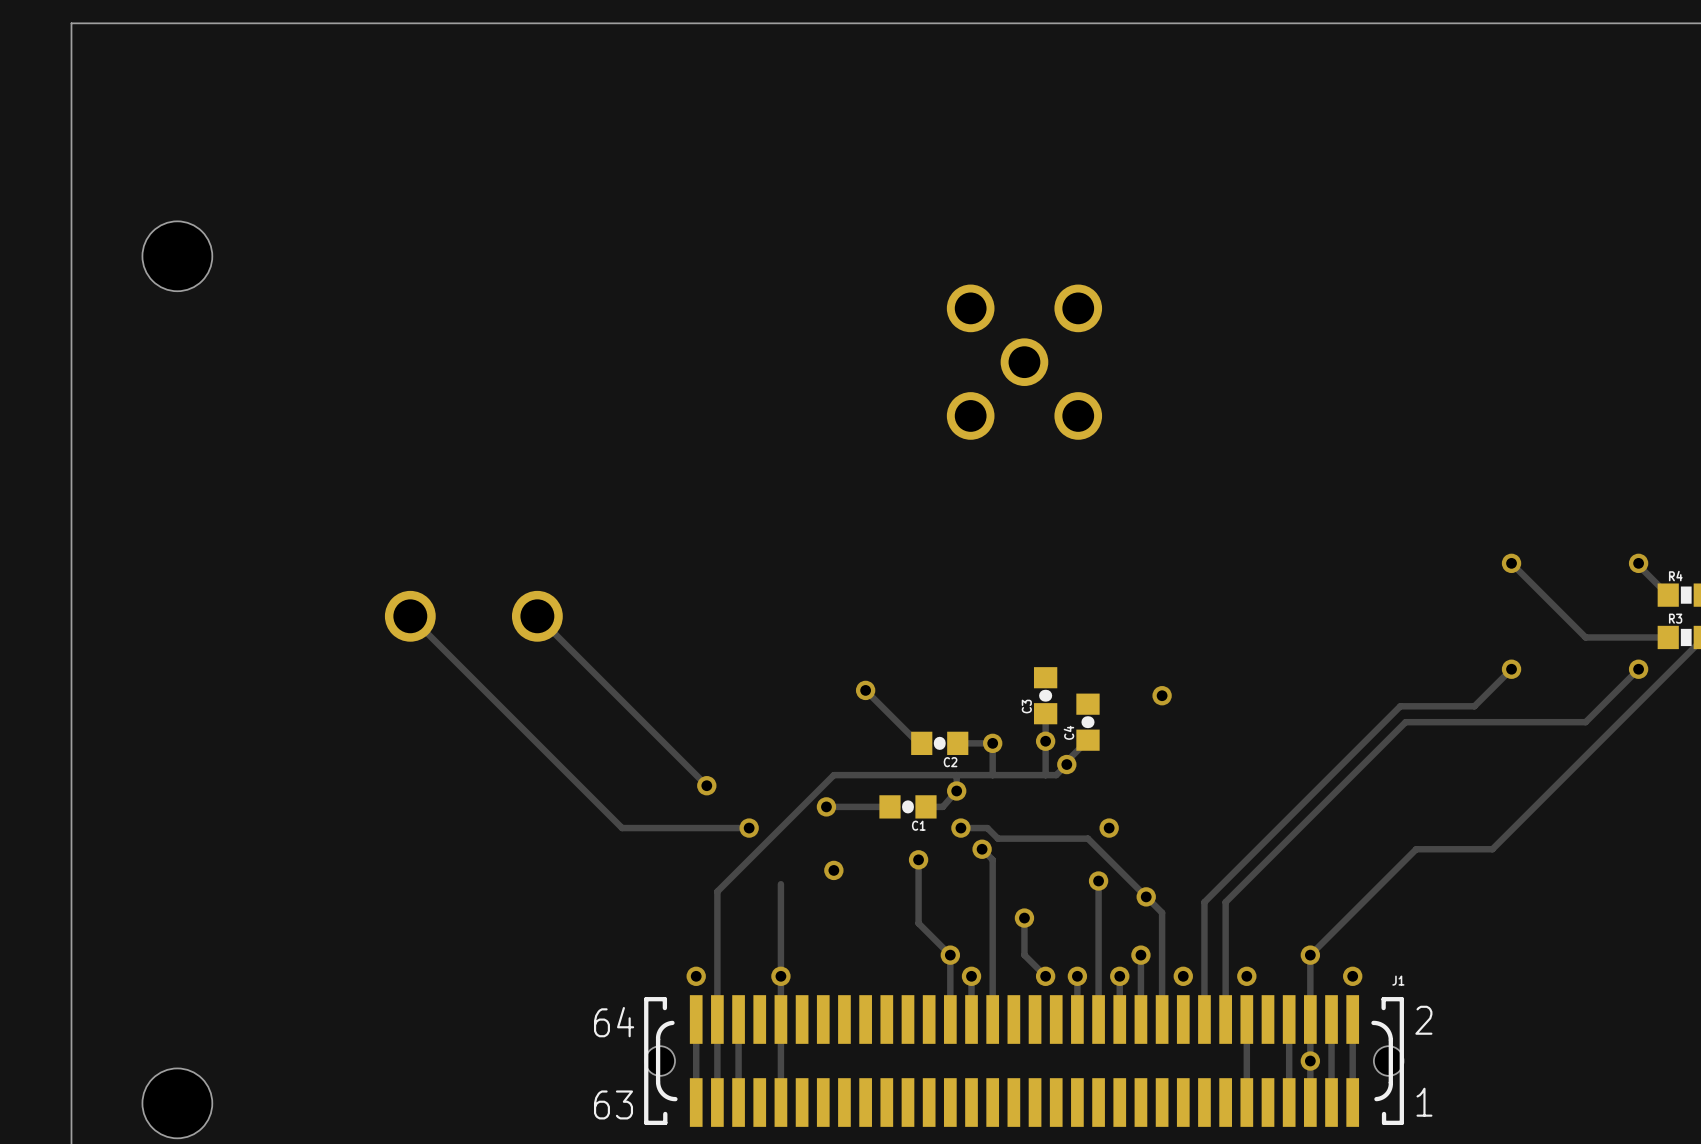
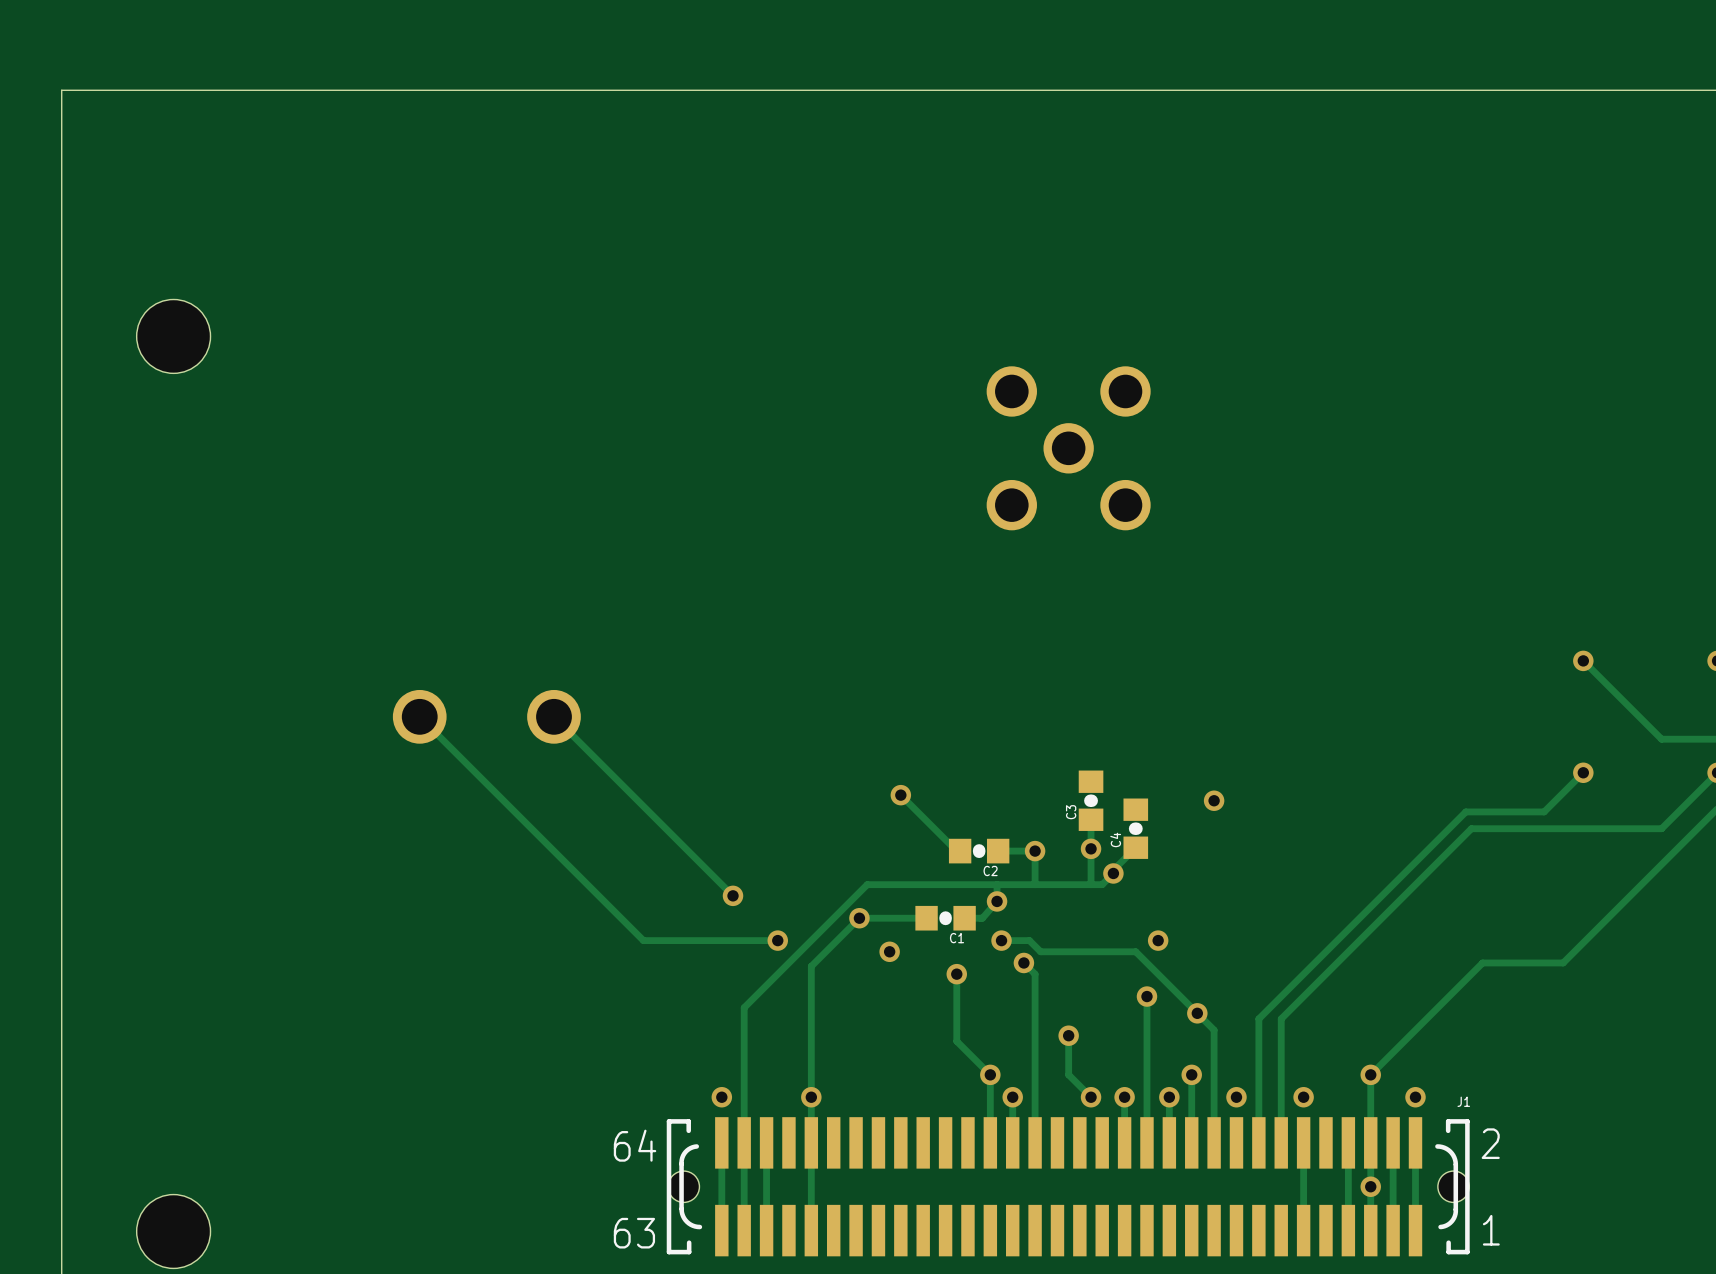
track: none -> (859, 918) (811, 966) (811, 999)
via position: (833, 870) -> (889, 951)

